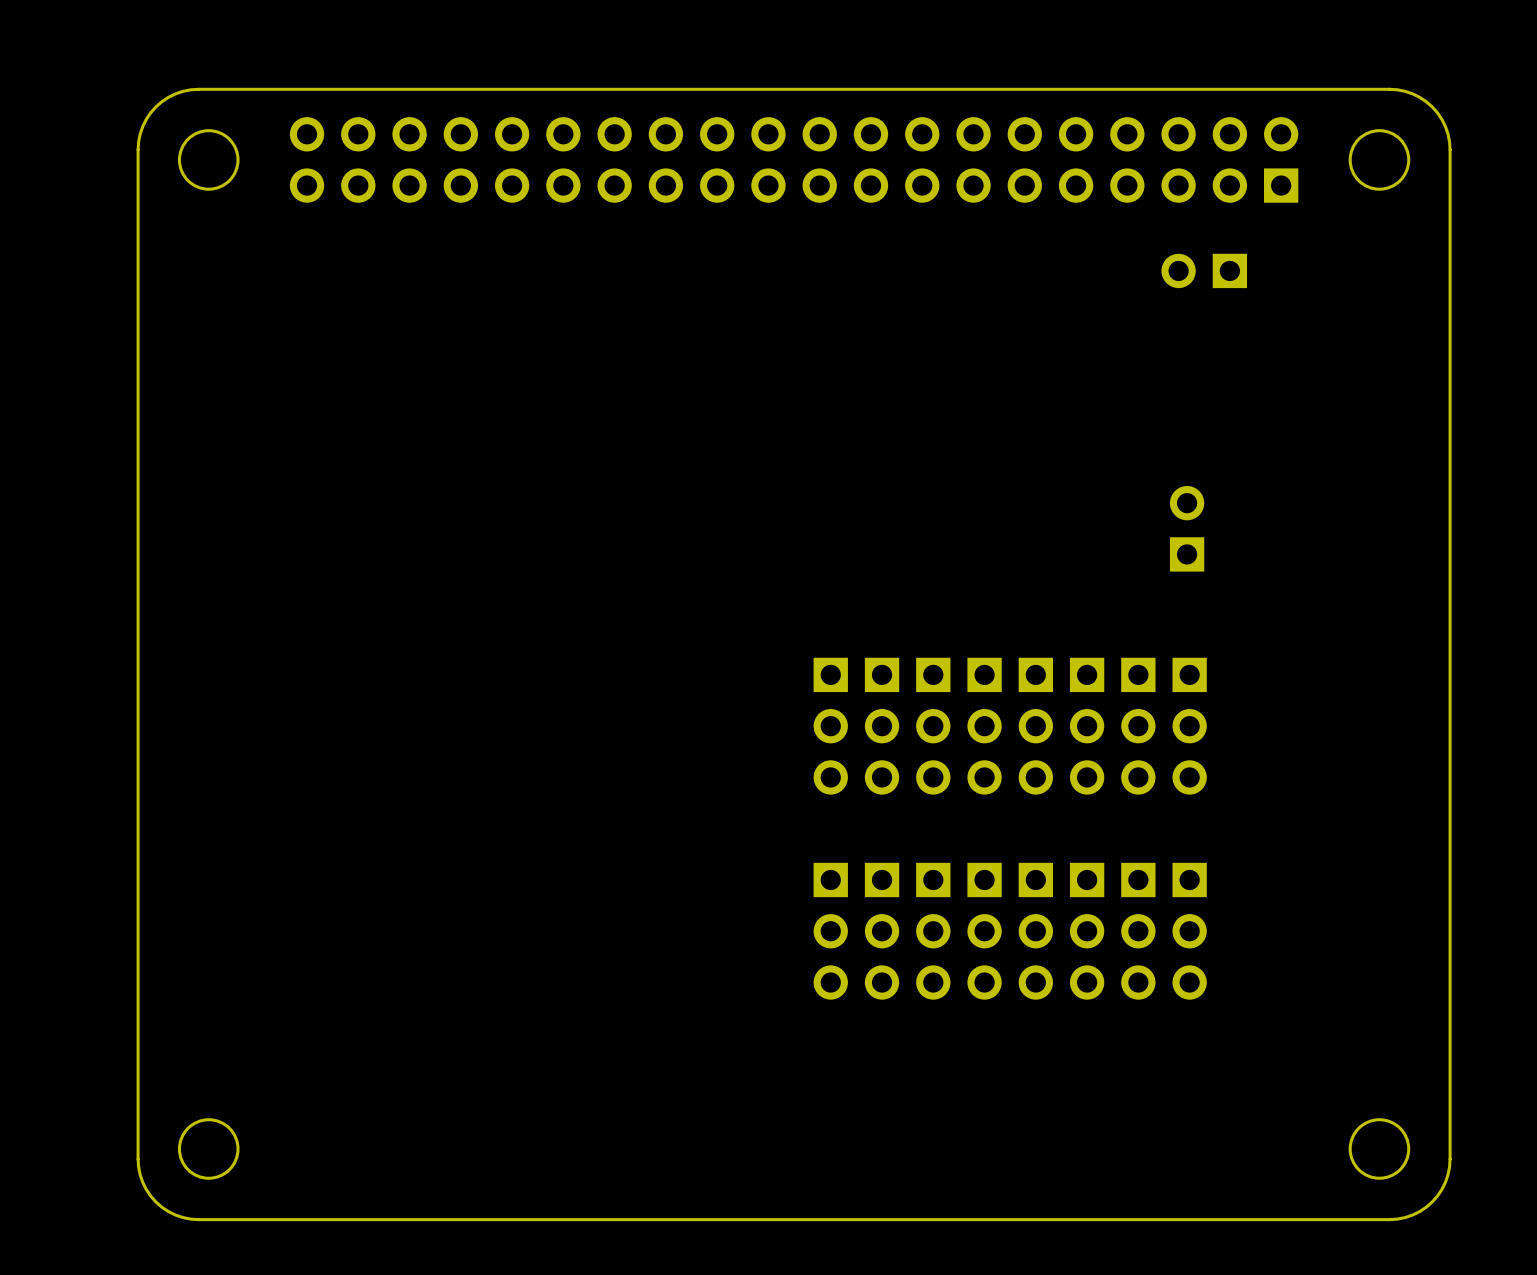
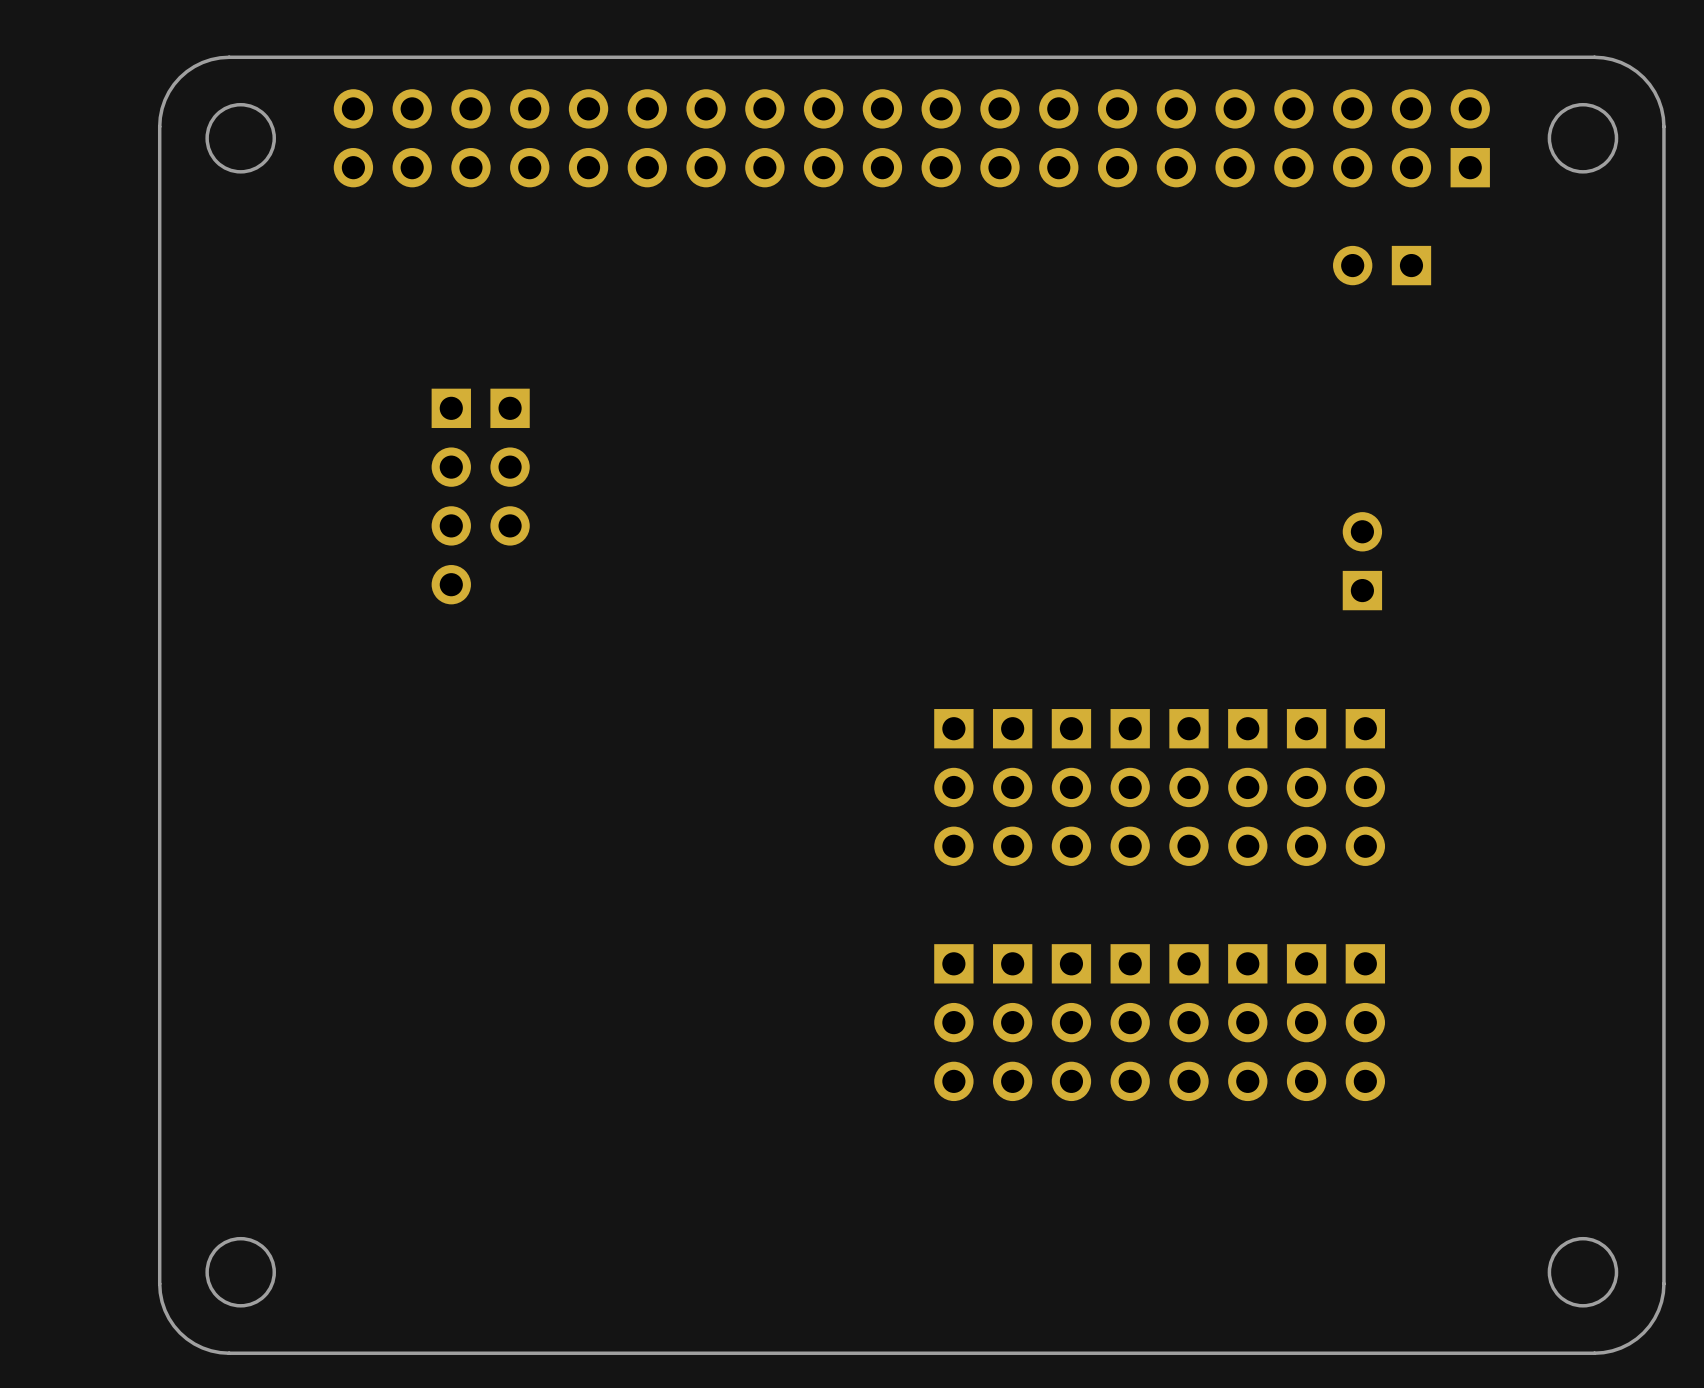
part: none -> (510, 467)
part: none -> (451, 496)

